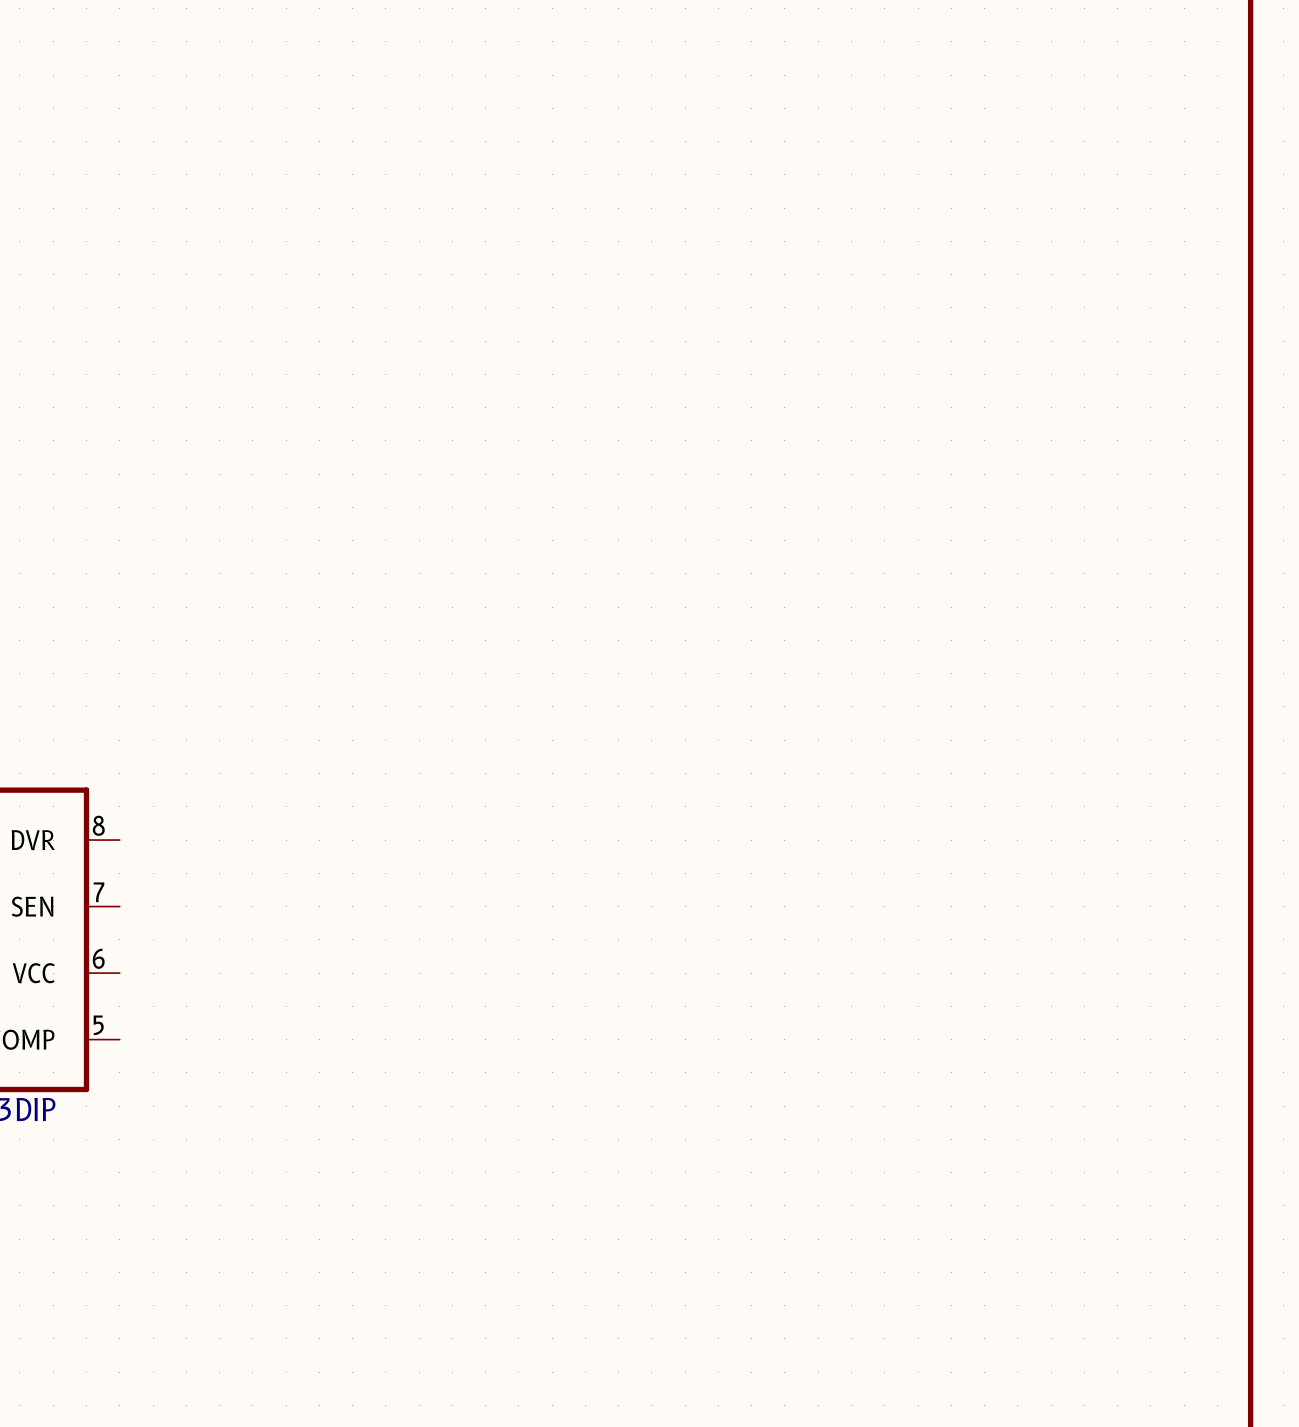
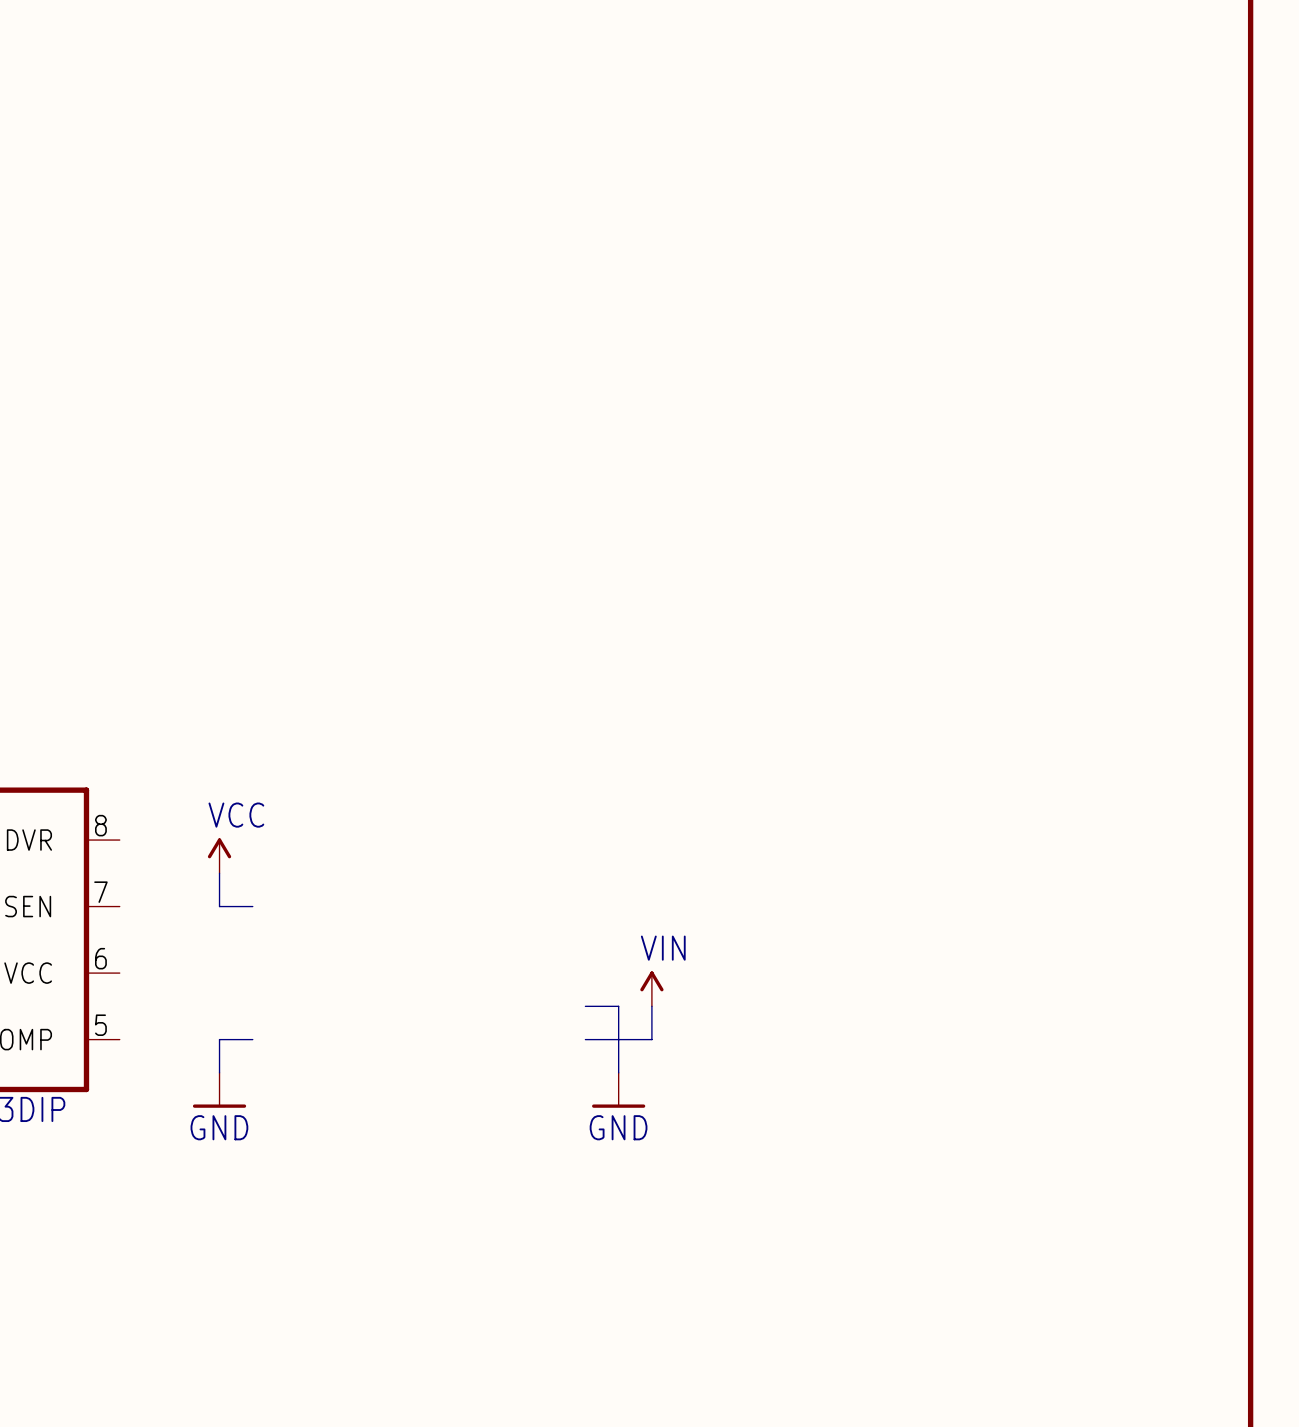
power symbol: none -> VCC (219, 855)
wire: none -> (219, 873) (219, 906) (252, 906)
power symbol: none -> VIN (651, 988)
wire: none -> (585, 1006) (618, 1006) (618, 1072)
wire: none -> (651, 1006) (651, 1039) (585, 1039)
wire: none -> (252, 1039) (219, 1039) (219, 1072)
power symbol: none -> GND (219, 1090)
power symbol: none -> GND (618, 1090)

